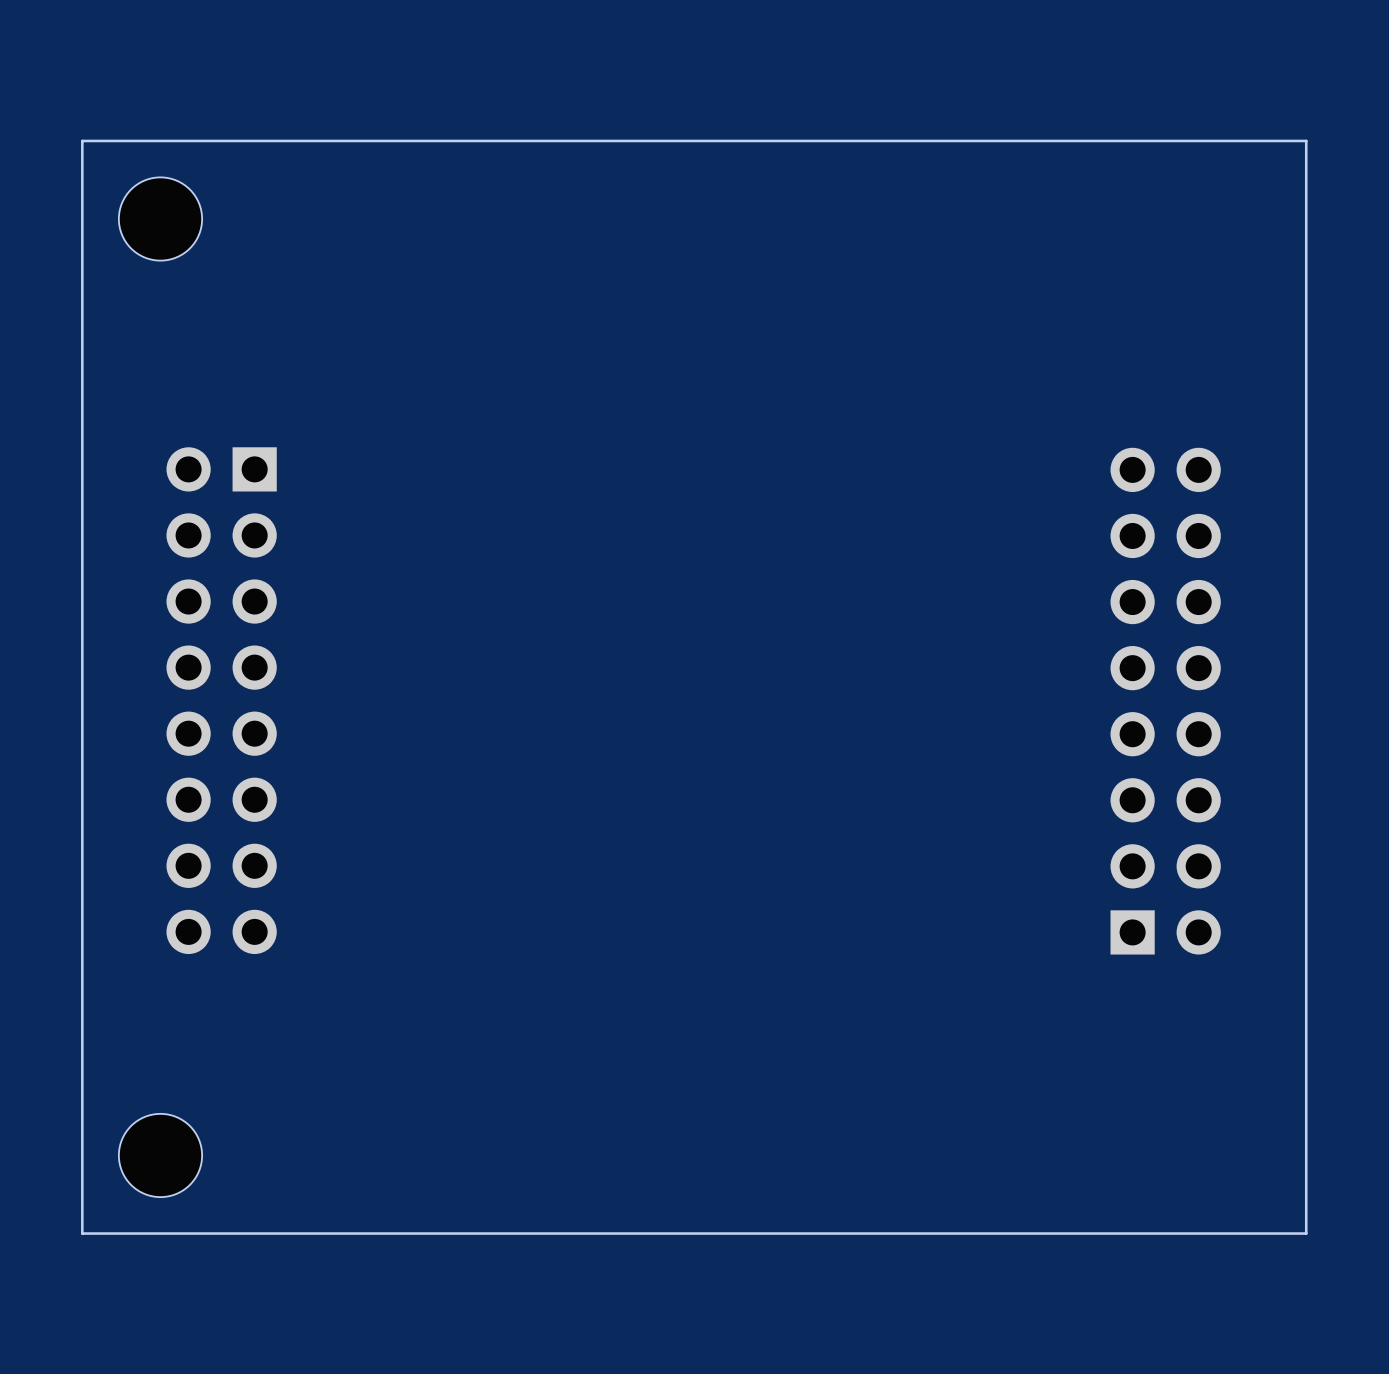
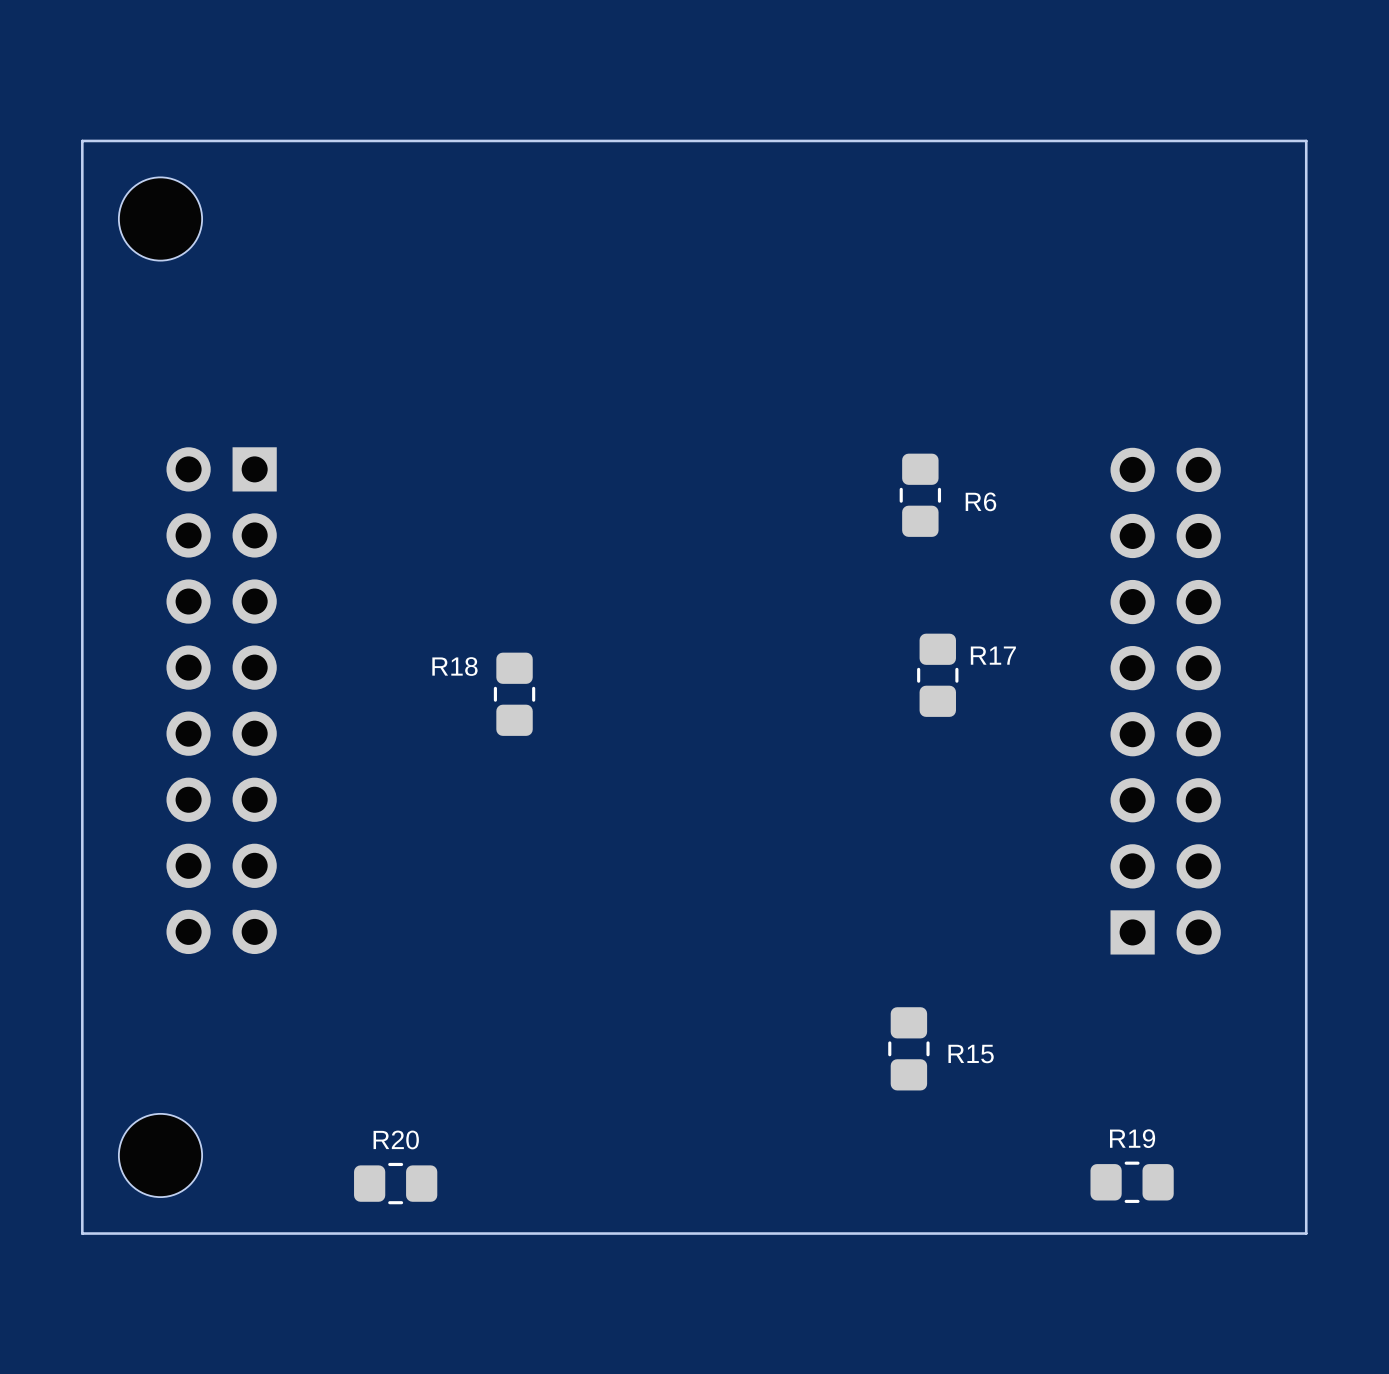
R6: none -> (920, 495)
R17: none -> (937, 675)
R18: none -> (514, 694)
R15: none -> (908, 1048)
R19: none -> (1132, 1182)
R20: none -> (395, 1183)

